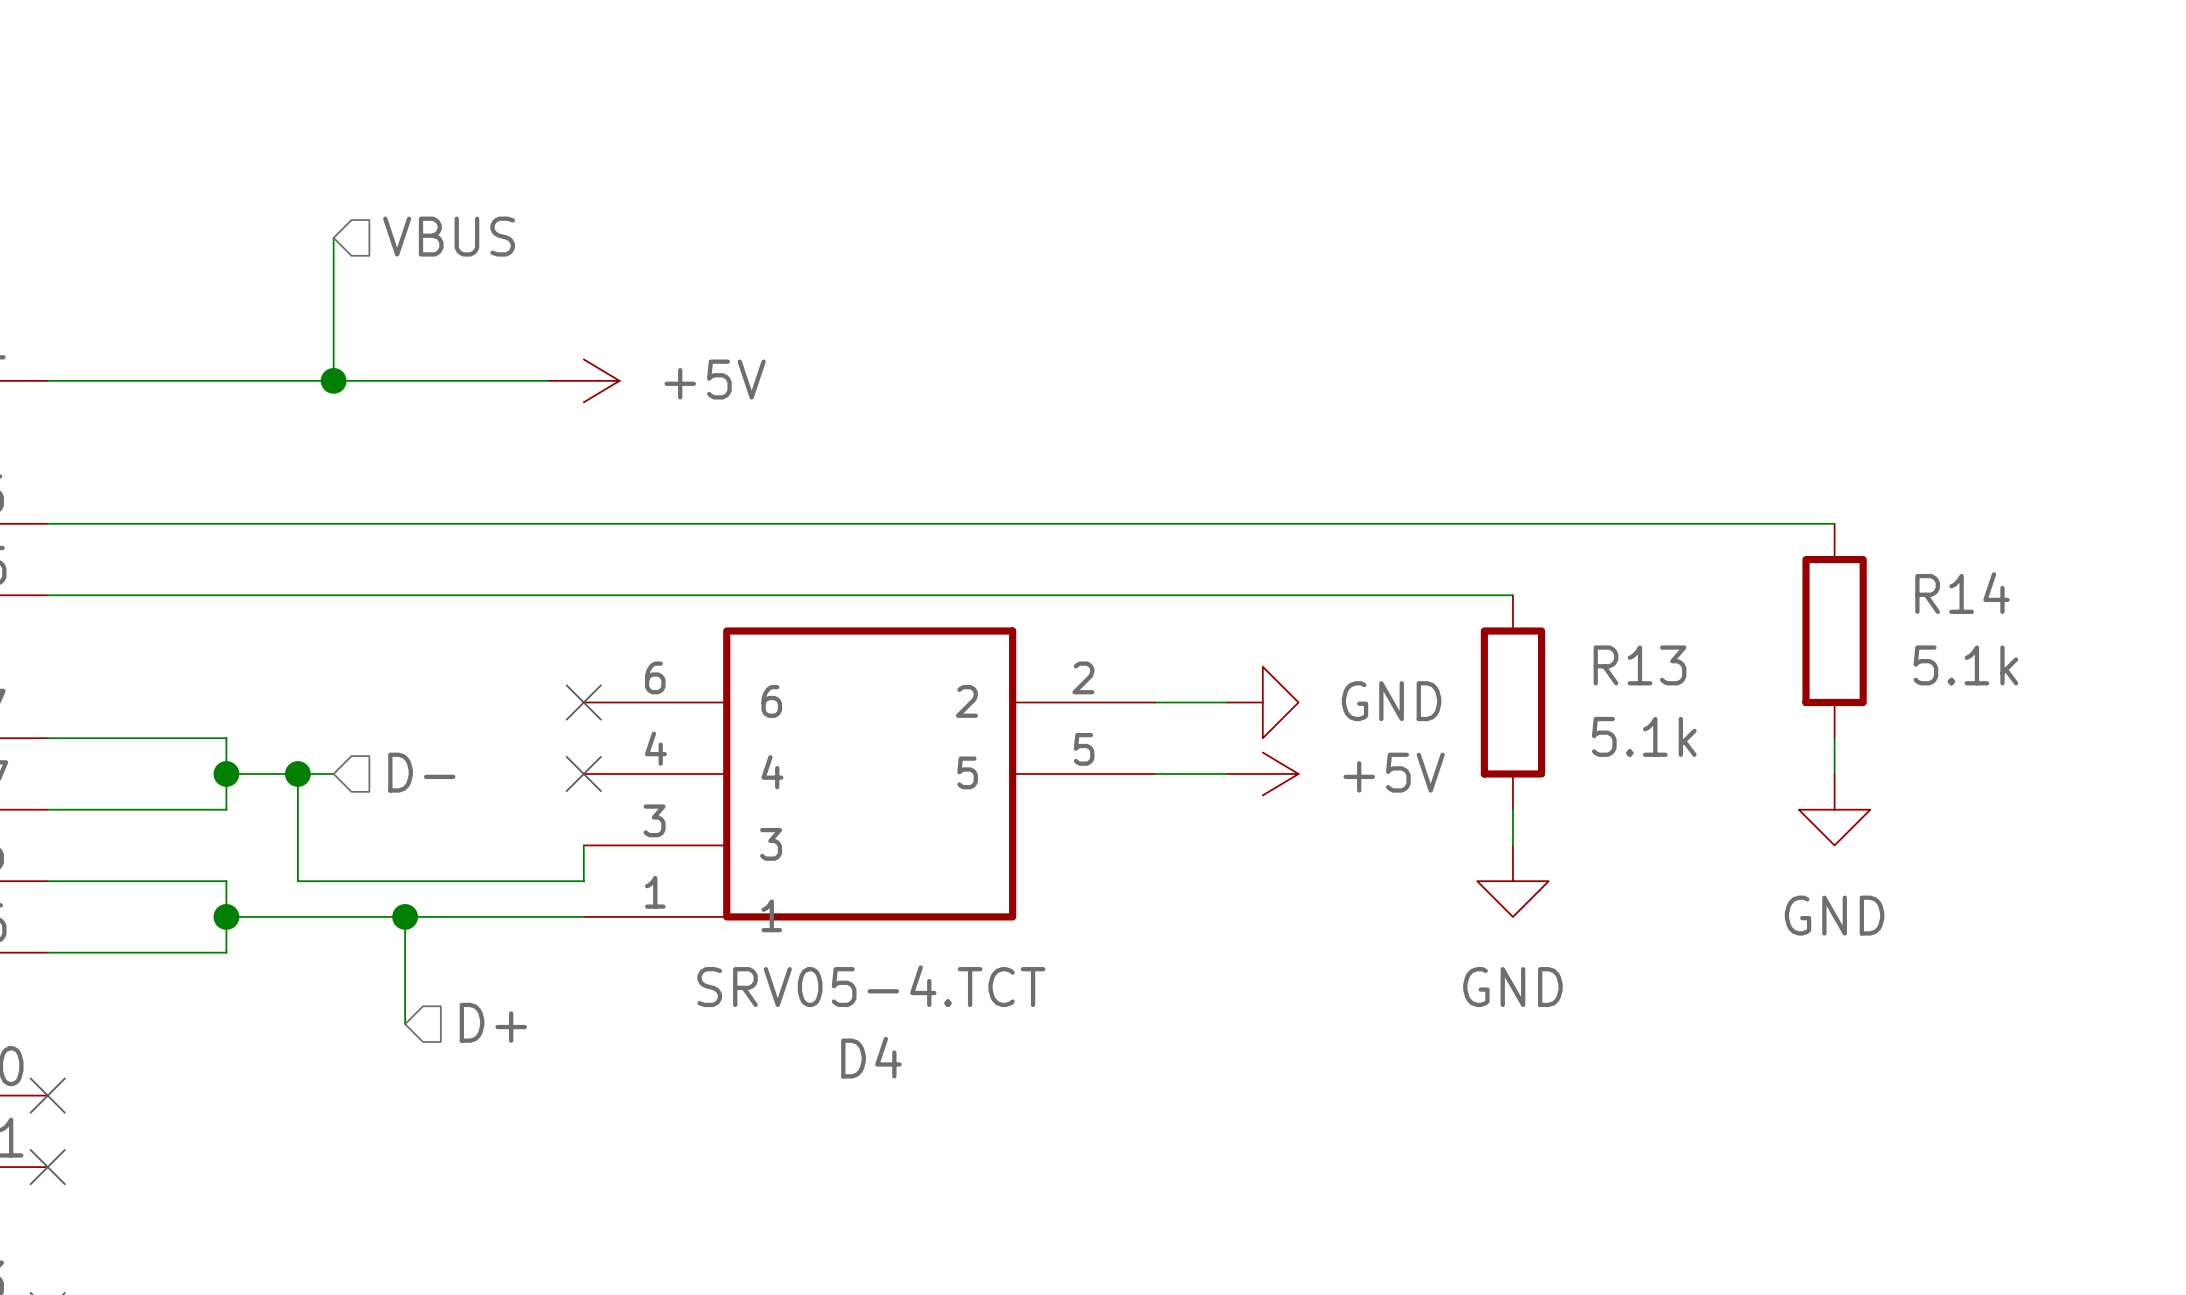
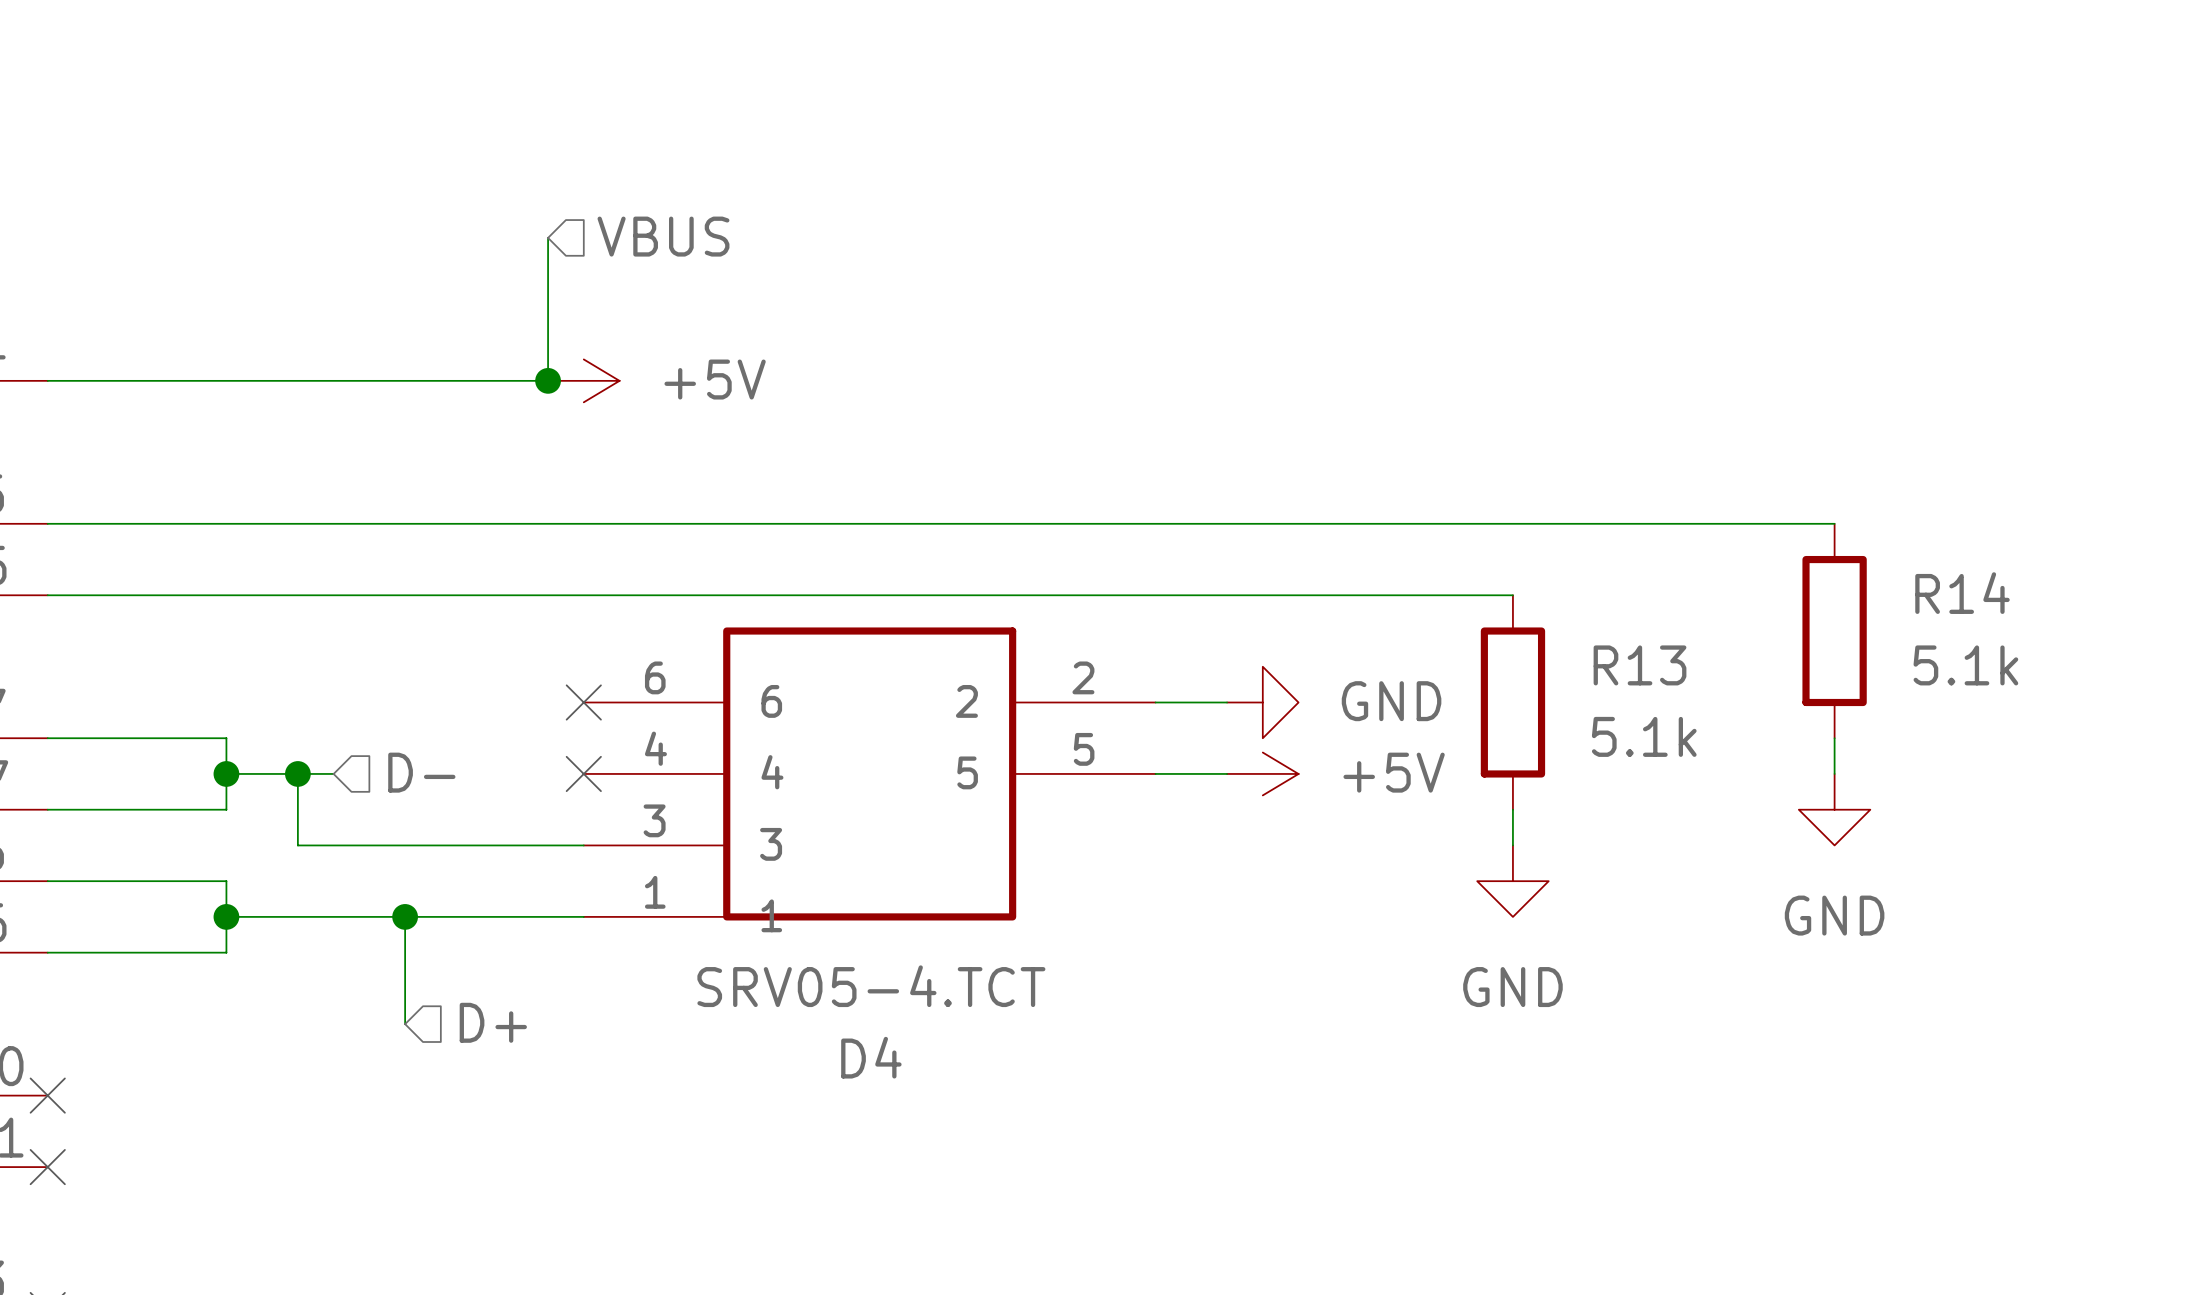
hierarchical label position: VBUS (449, 236) -> VBUS (663, 236)
wire: (333, 237) (333, 380) -> (548, 237) (548, 380)
junction: (333, 380) -> none
junction: none -> (548, 380)
wire: (297, 845) (297, 881) (583, 881) (583, 845) -> (297, 845) (583, 845)

